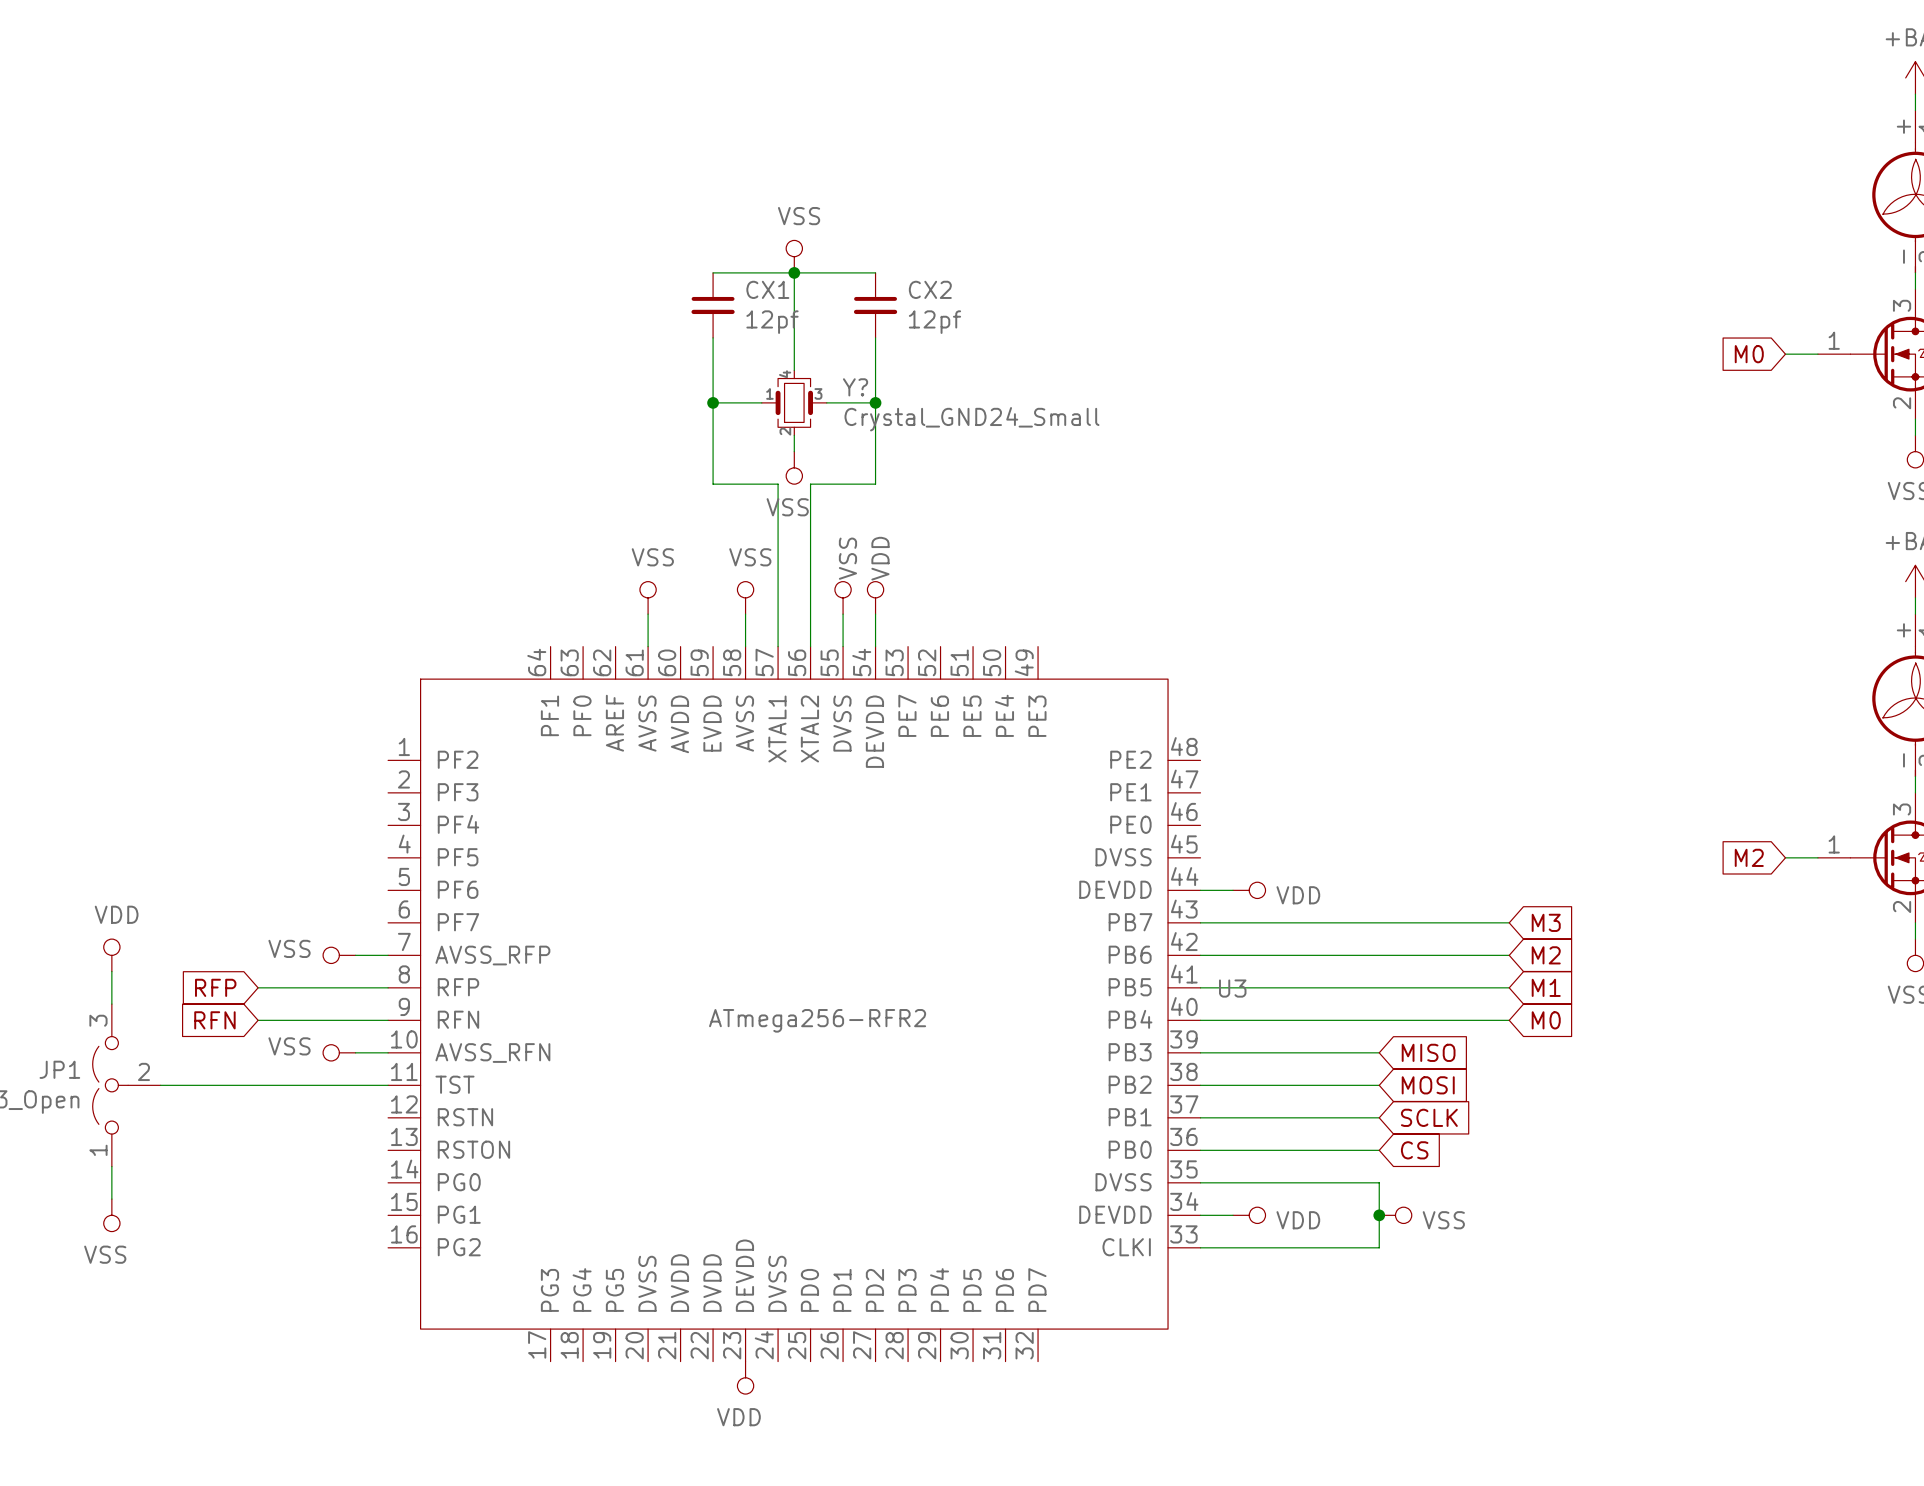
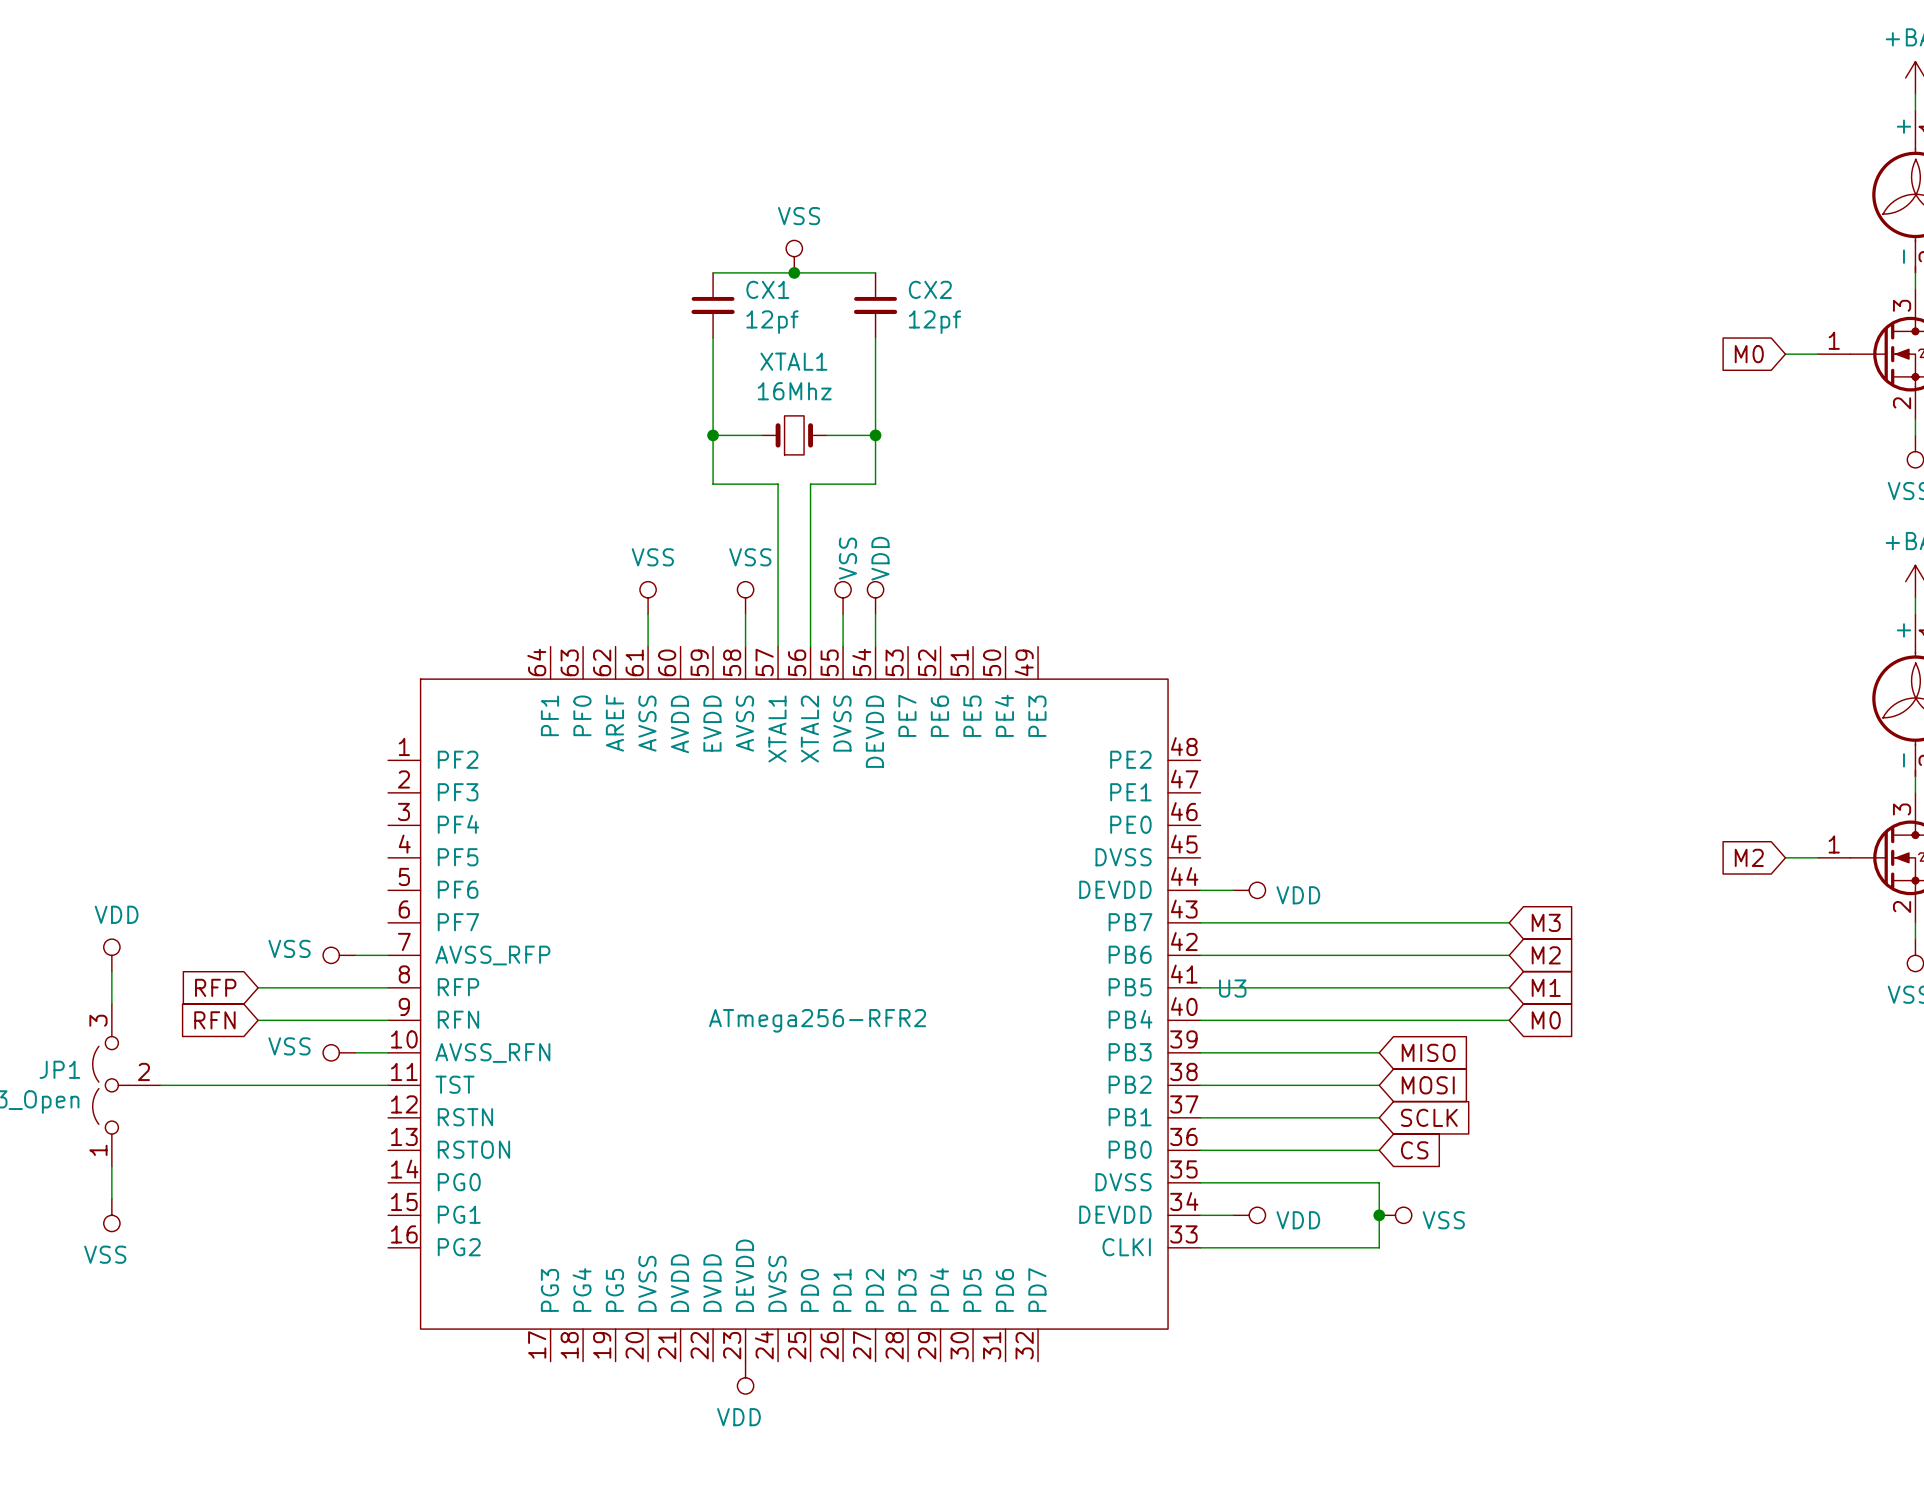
wire: (794, 272) (794, 370) -> none
wire: (713, 402) (761, 402) -> (713, 435) (761, 435)
junction position: (713, 402) -> (713, 435)
Y?: Crystal_GND24_Small (794, 402) -> none
wire: (826, 402) (875, 402) -> (826, 435) (875, 435)
junction position: (875, 402) -> (875, 435)
wire: (794, 435) (794, 451) -> none
XTAL1: none -> 16Mhz (794, 435)
power symbol: VSS (794, 467) -> none

